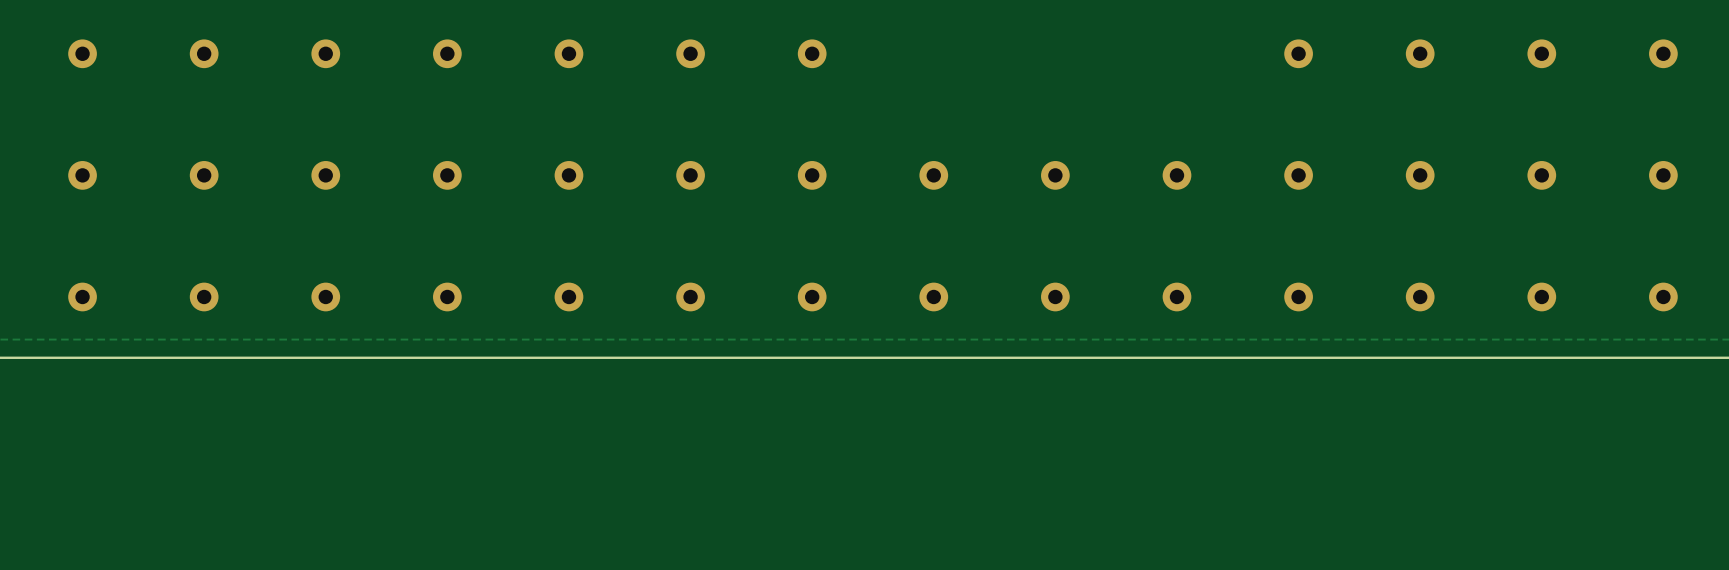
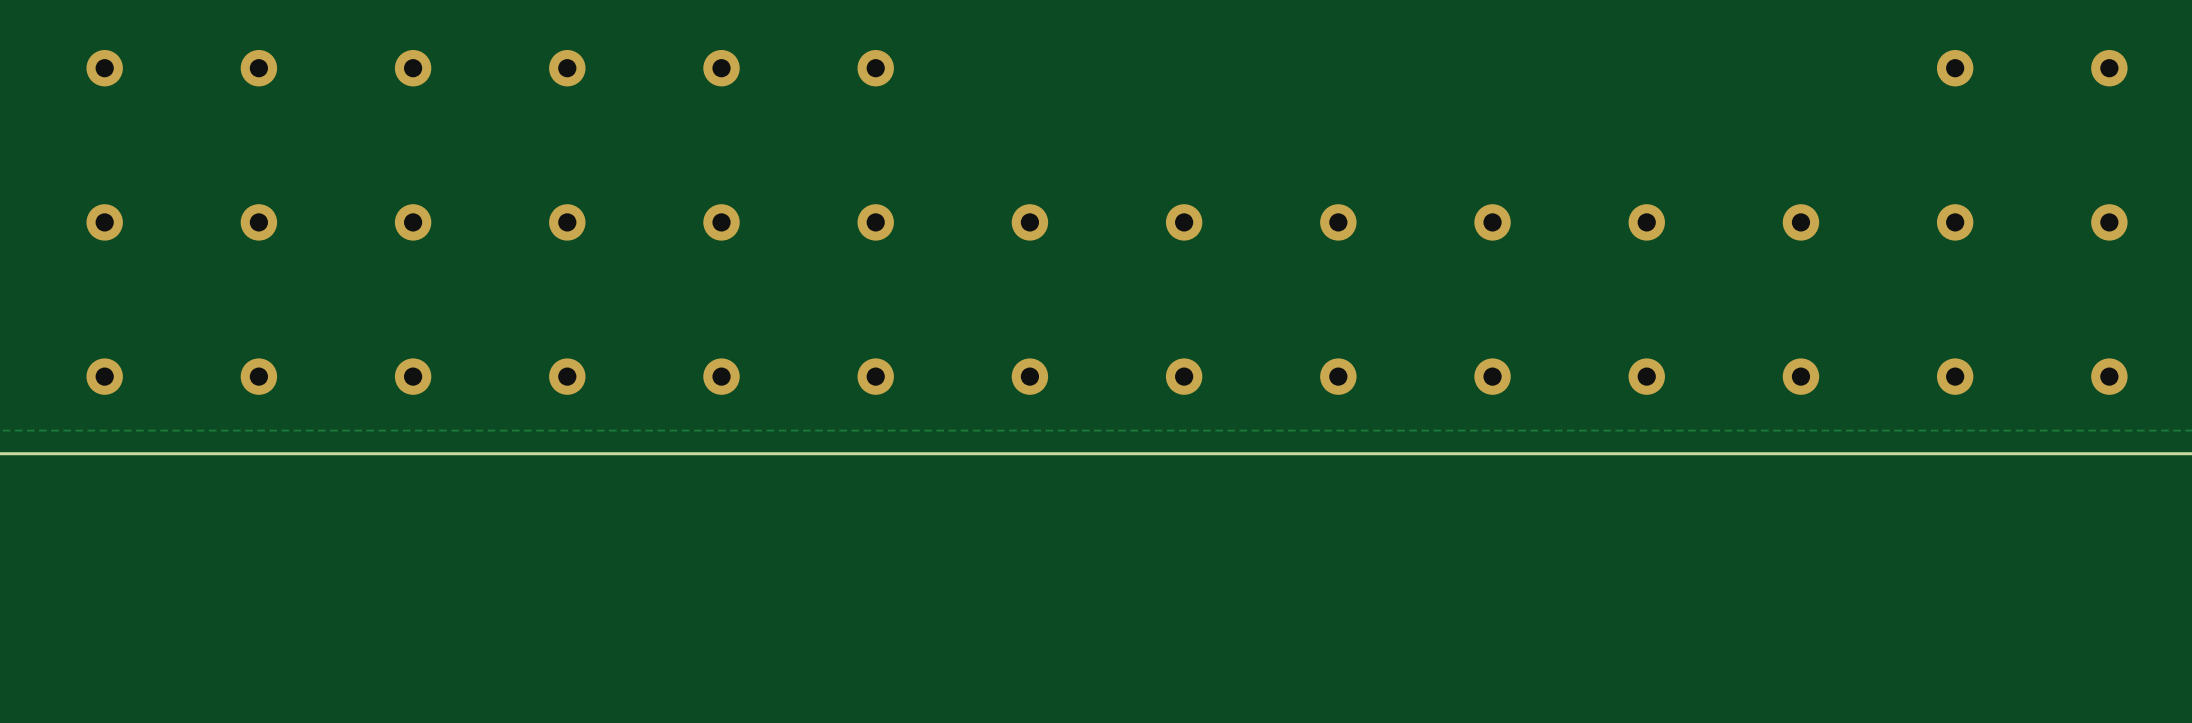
via: (812, 53) -> none
via: (1298, 53) -> none
via: (1420, 53) -> none

